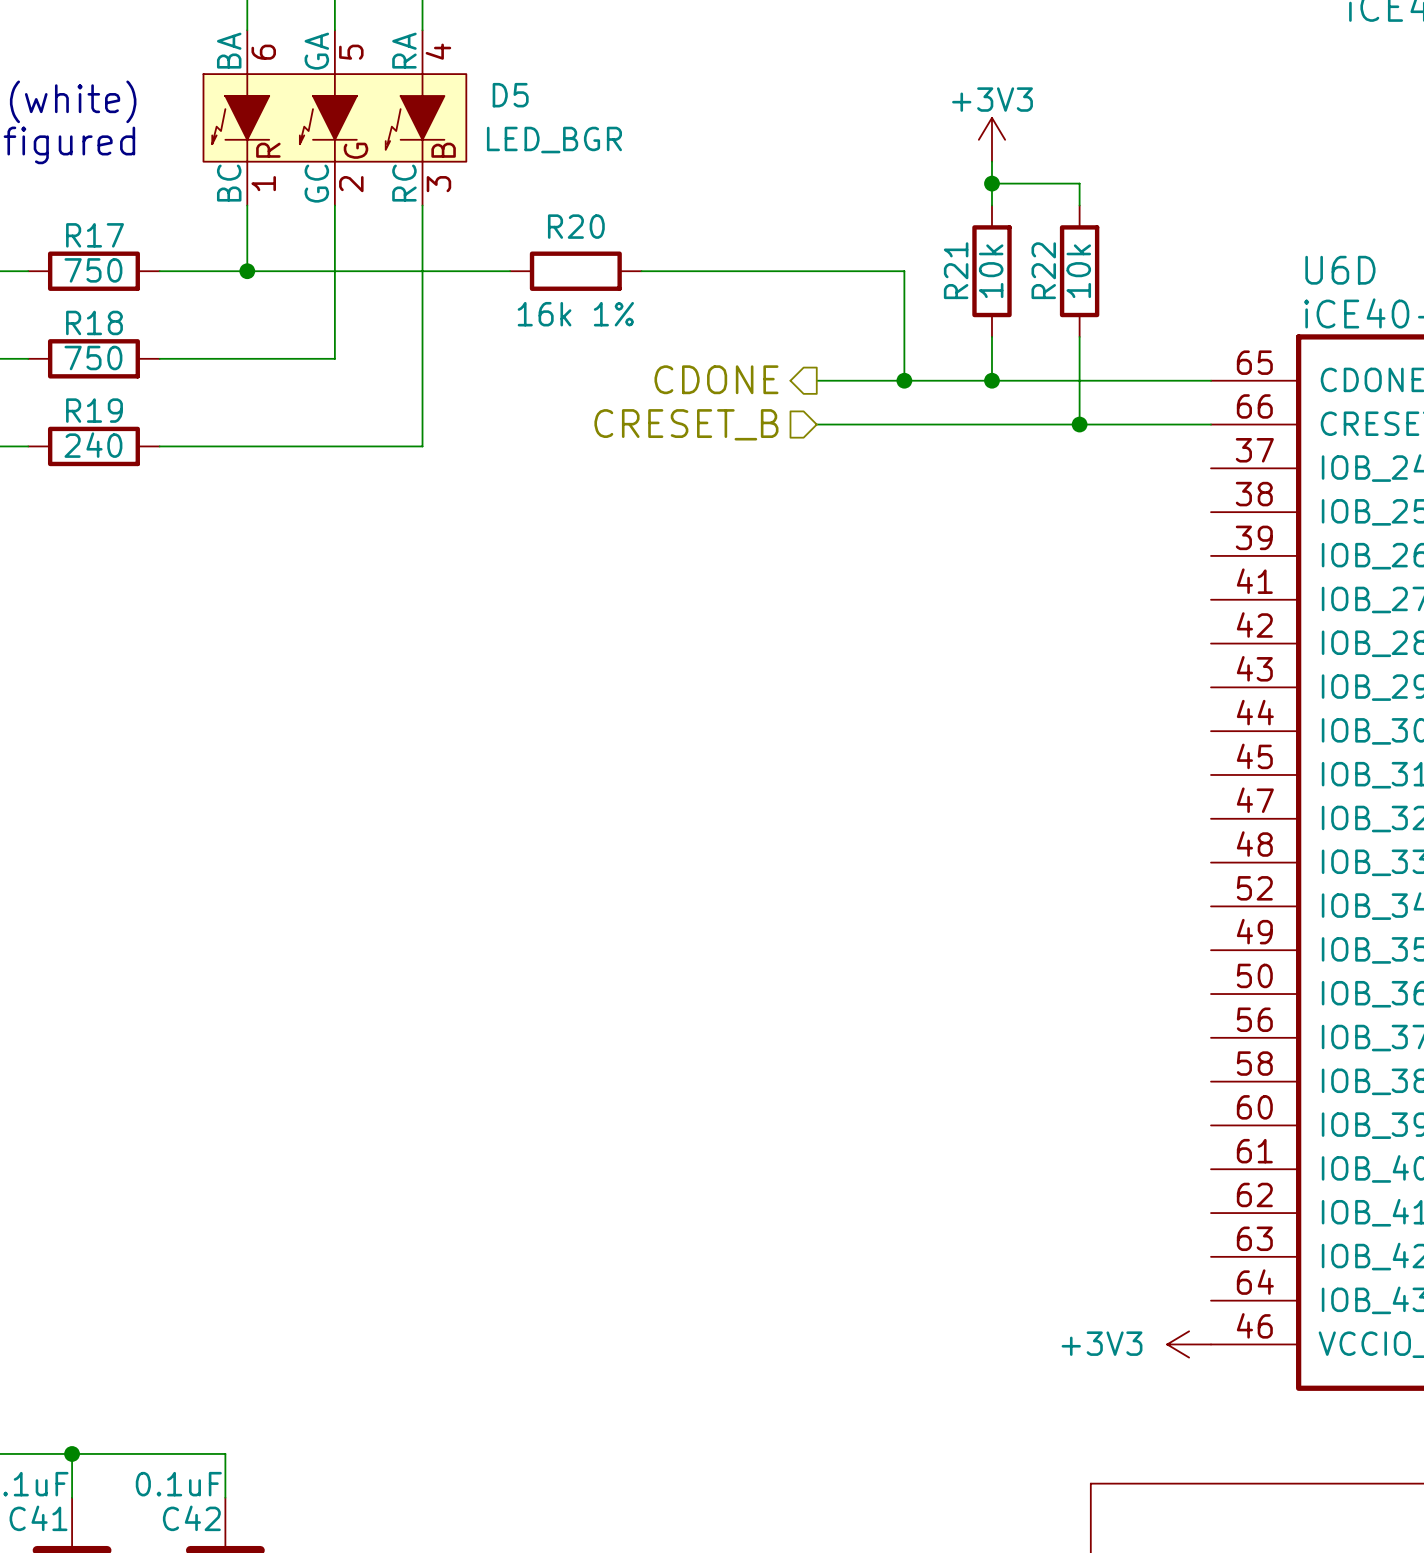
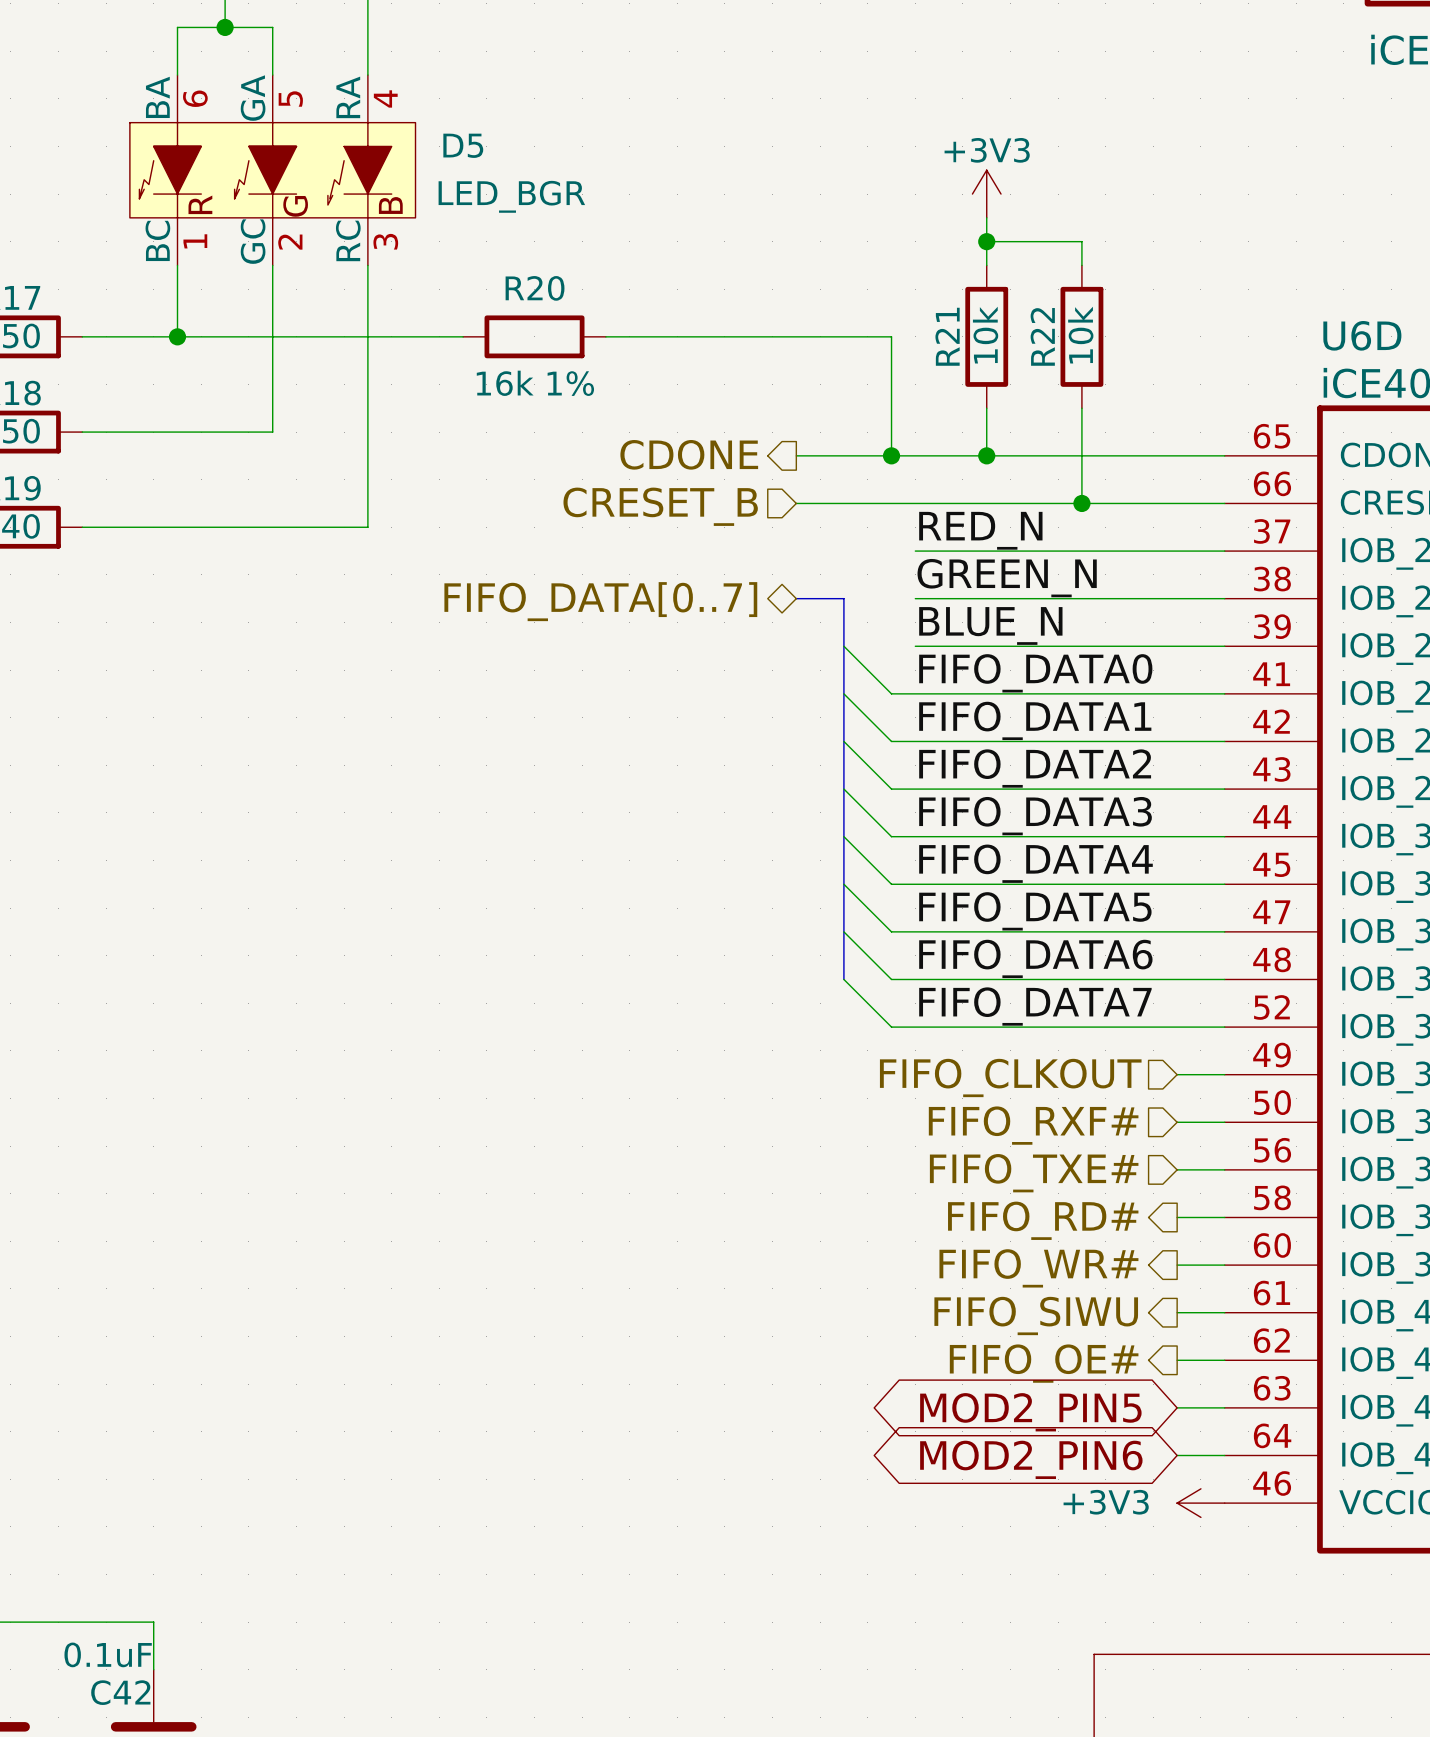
label: none -> RED_N (980, 530)
wire: none -> (915, 551) (1224, 551)
label: none -> GREEN_N (1007, 578)
bus: none -> (796, 598) (843, 598) (843, 979)
wire: none -> (915, 598) (1224, 598)
hierarchical label: none -> FIFO_DATA[0..7] (600, 601)
label: none -> BLUE_N (990, 625)
wire: none -> (843, 646) (891, 693) (1224, 693)
wire: none -> (915, 646) (1224, 646)
label: none -> FIFO_DATA0 (1035, 673)
wire: none -> (843, 693) (891, 741) (1224, 741)
label: none -> FIFO_DATA1 (1035, 720)
wire: none -> (843, 741) (891, 789) (1224, 789)
label: none -> FIFO_DATA2 (1035, 768)
wire: none -> (843, 789) (891, 836) (1224, 836)
label: none -> FIFO_DATA3 (1035, 816)
wire: none -> (843, 836) (891, 884) (1224, 884)
label: none -> FIFO_DATA4 (1035, 863)
wire: none -> (843, 884) (891, 931) (1224, 931)
label: none -> FIFO_DATA5 (1035, 911)
wire: none -> (843, 931) (891, 979) (1224, 979)
label: none -> FIFO_DATA6 (1035, 958)
wire: none -> (843, 979) (891, 1027) (1224, 1027)
label: none -> FIFO_DATA7 (1035, 1006)
hierarchical label: none -> FIFO_CLKOUT (1010, 1077)
wire: none -> (1177, 1074) (1224, 1074)
hierarchical label: none -> FIFO_RXF# (1033, 1125)
wire: none -> (1177, 1122) (1224, 1122)
wire: none -> (1177, 1169) (1224, 1169)
hierarchical label: none -> FIFO_TXE# (1034, 1173)
hierarchical label: none -> FIFO_RD# (1043, 1220)
wire: none -> (1177, 1217) (1224, 1217)
hierarchical label: none -> FIFO_WR# (1038, 1268)
wire: none -> (1177, 1265) (1224, 1265)
hierarchical label: none -> FIFO_SIWU (1036, 1315)
wire: none -> (1177, 1312) (1224, 1312)
hierarchical label: none -> FIFO_OE# (1044, 1363)
wire: none -> (1177, 1360) (1224, 1360)
wire: none -> (1177, 1407) (1224, 1407)
global label: none -> MOD2_PIN5 (1030, 1412)
wire: none -> (1177, 1455) (1224, 1455)
global label: none -> MOD2_PIN6 (1031, 1459)

